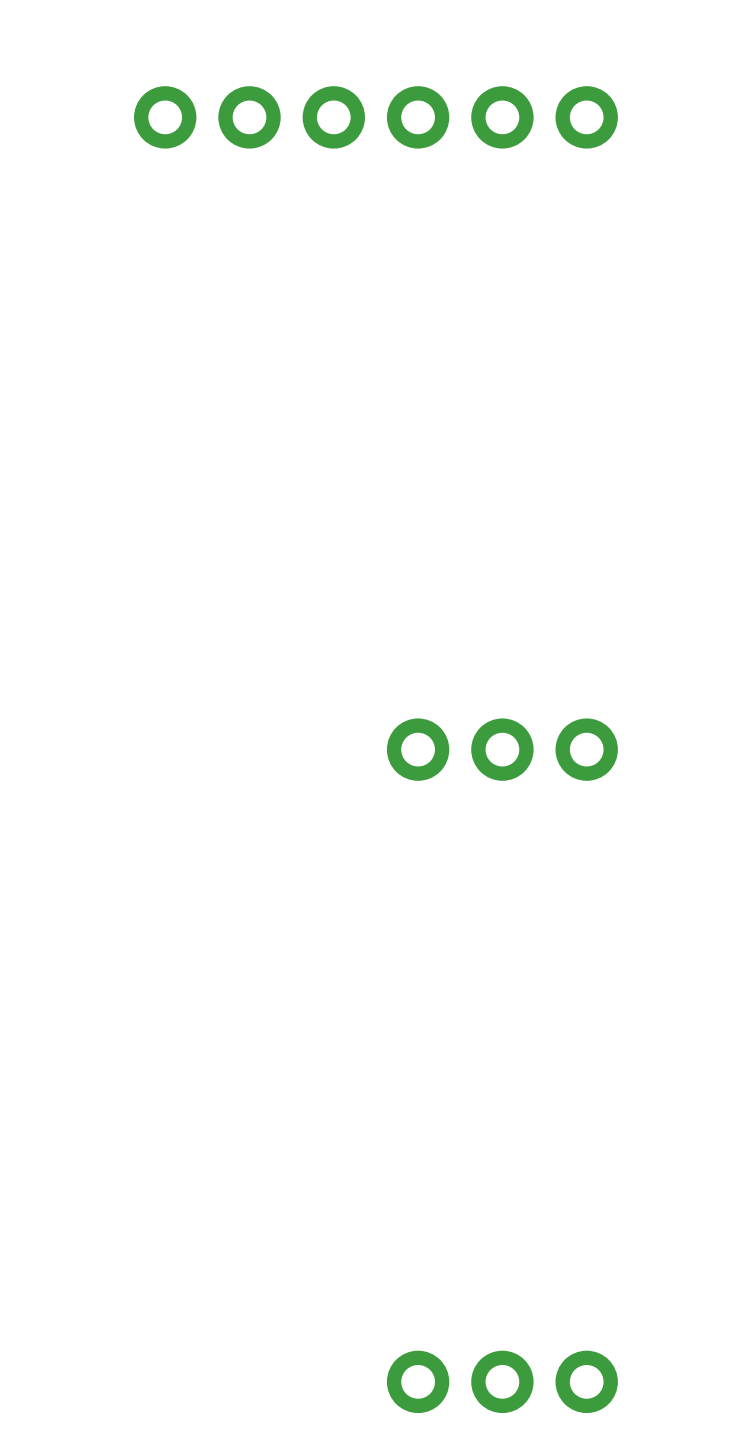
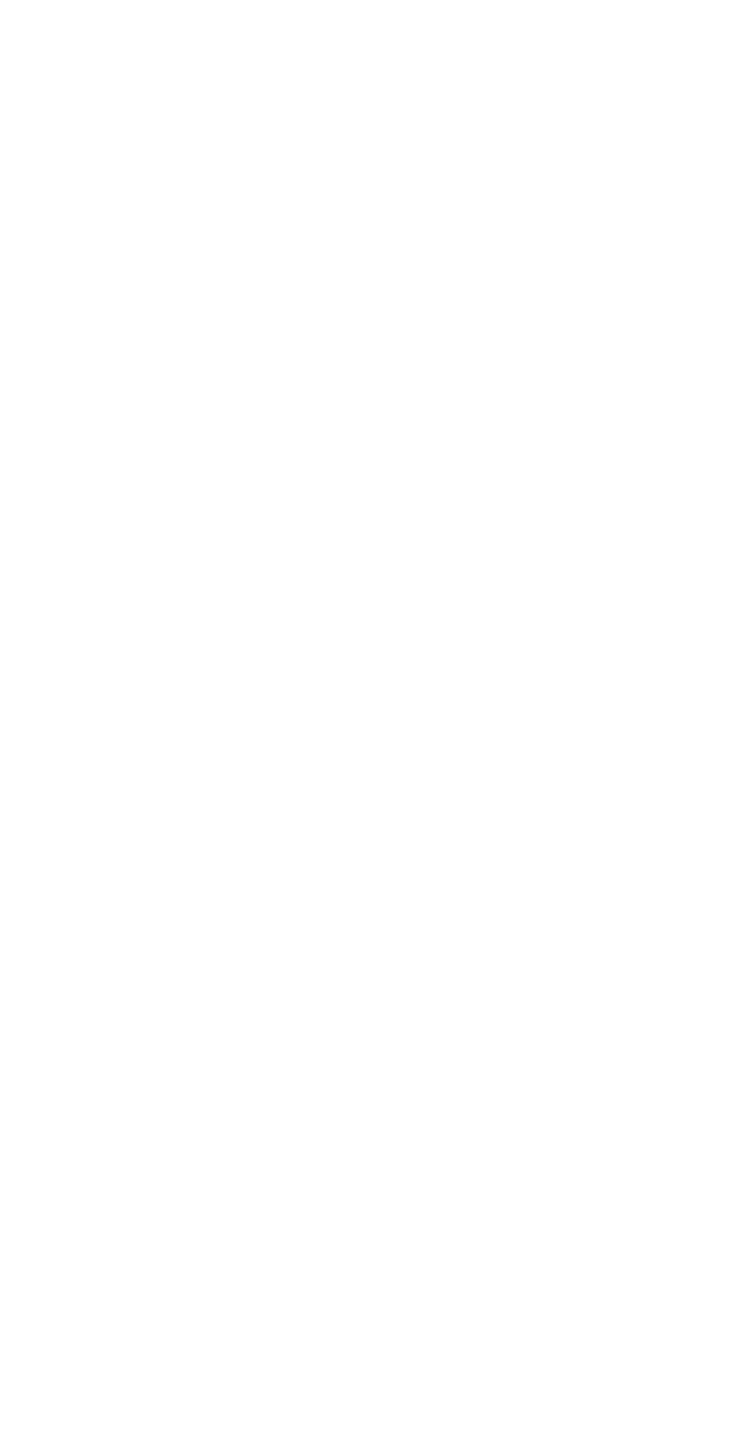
part: (375, 117) -> none
part: (502, 749) -> none
part: (502, 1381) -> none

